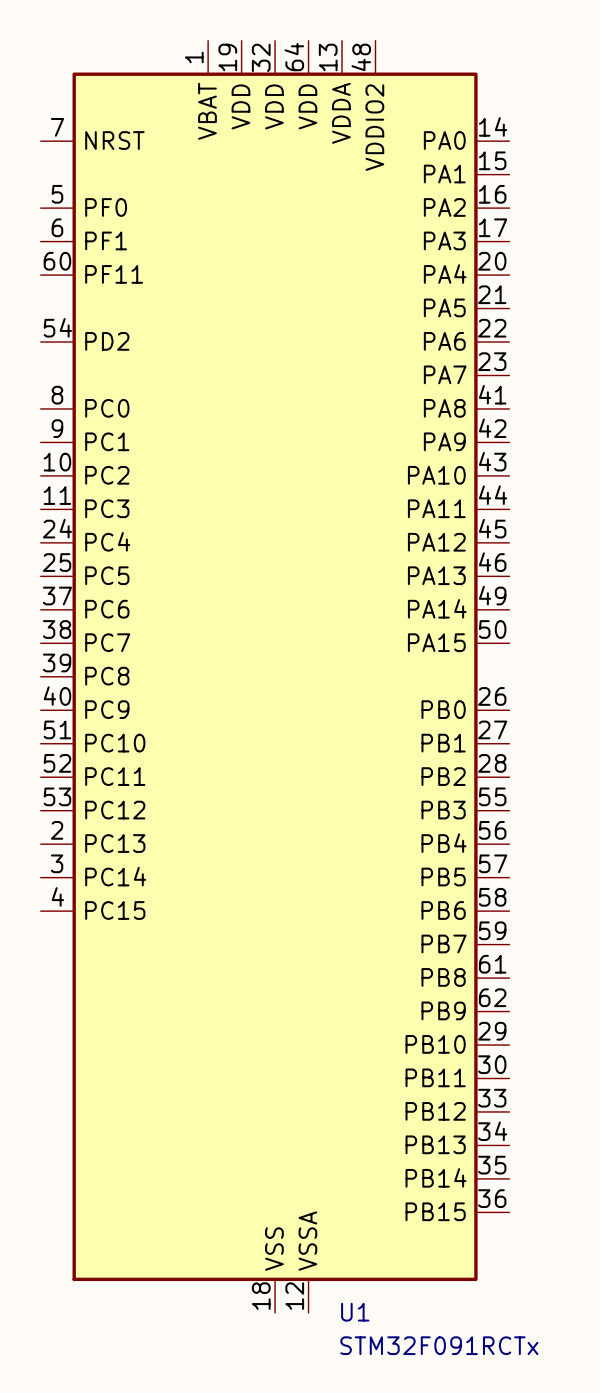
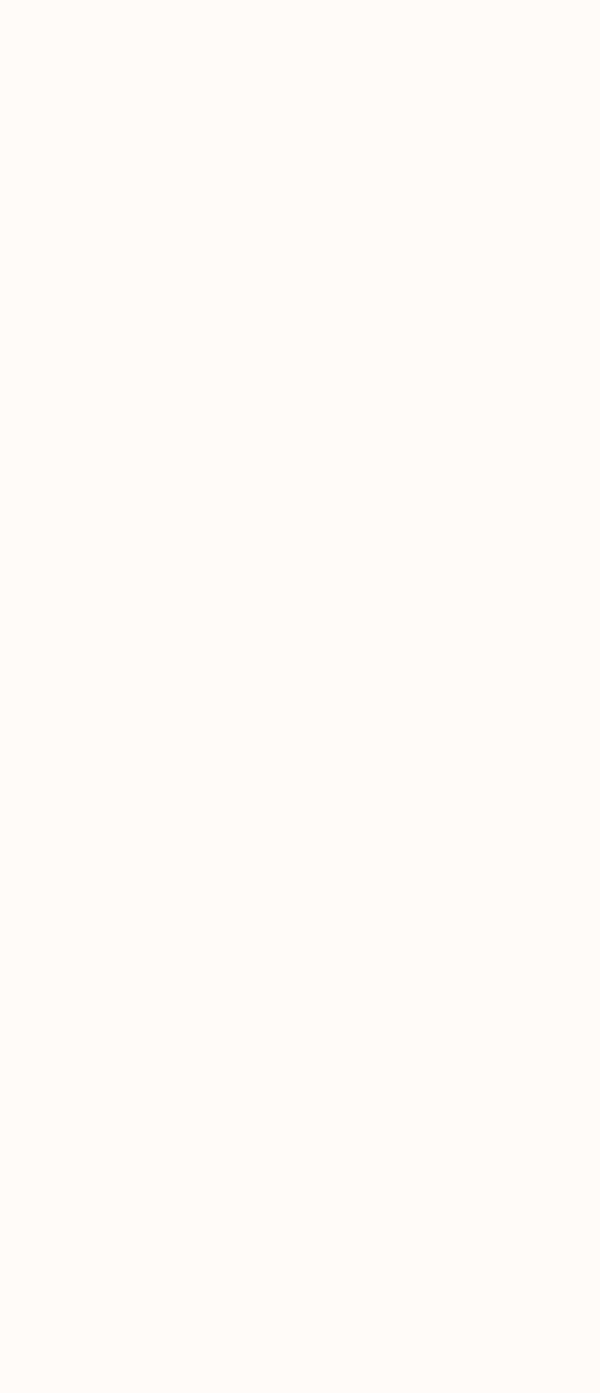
U1: STM32F091RCTx (275, 676) -> none

